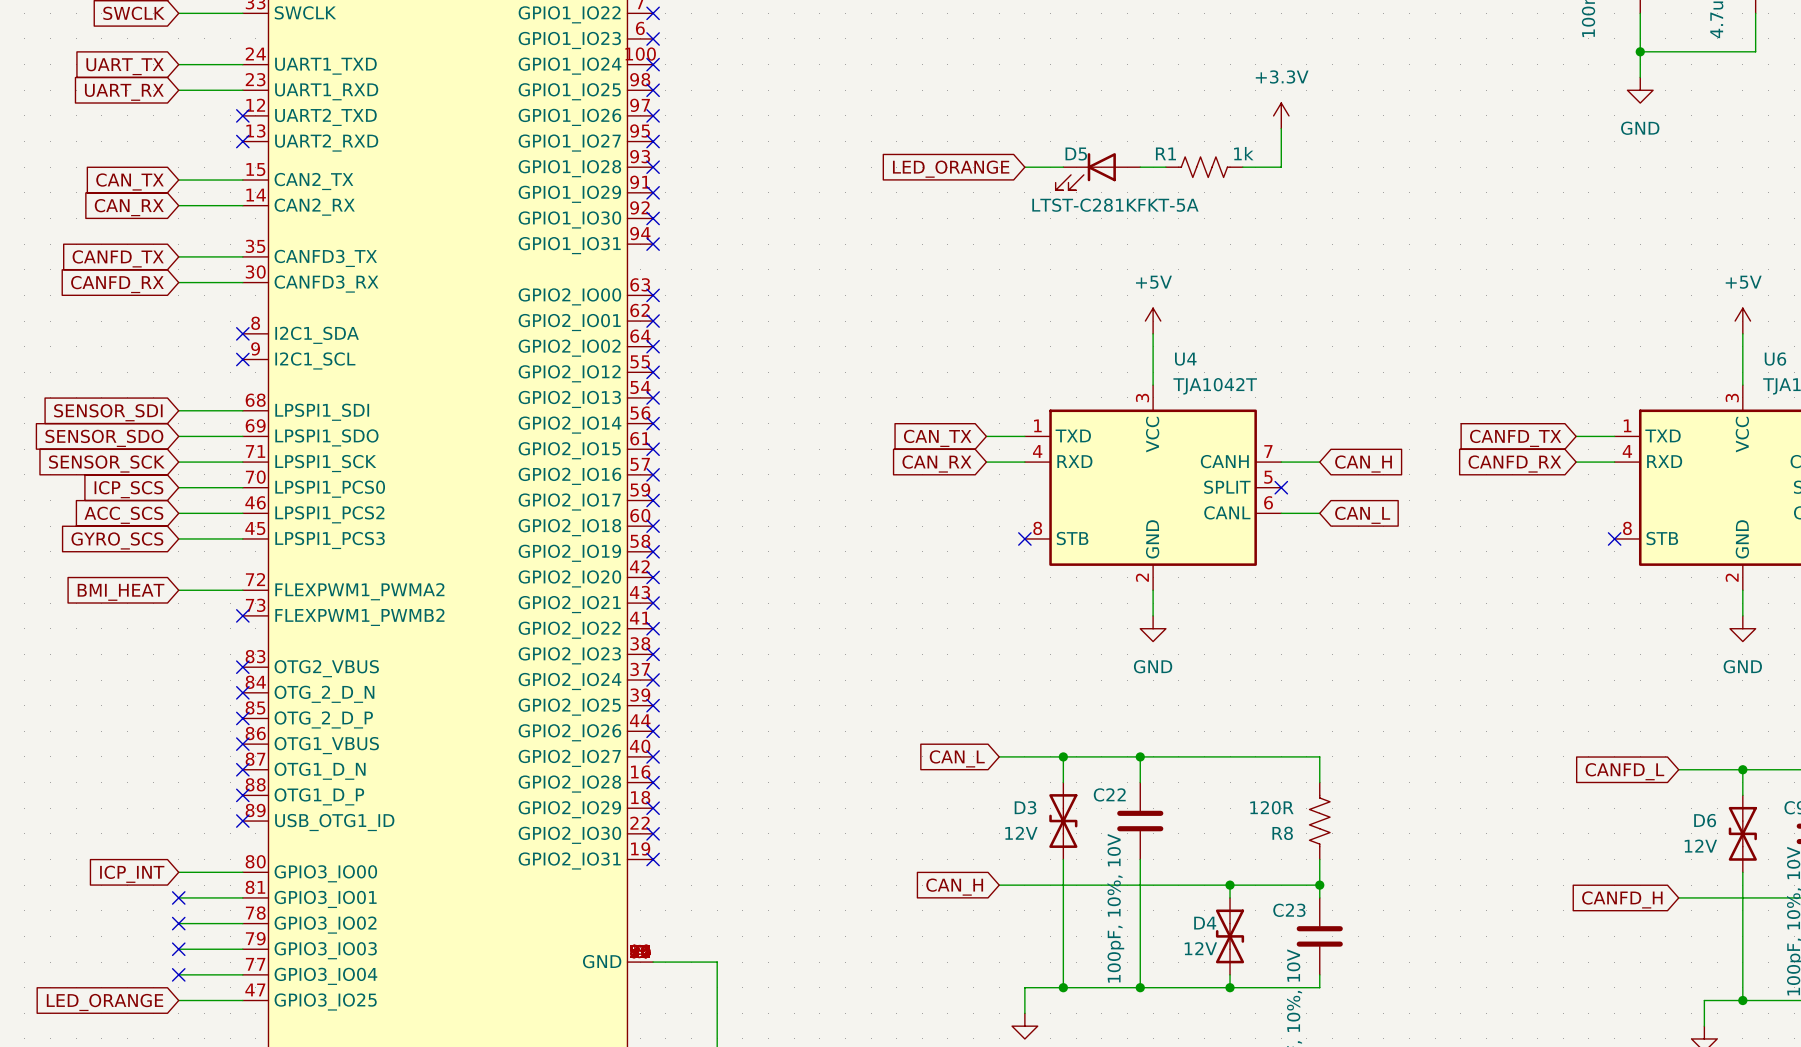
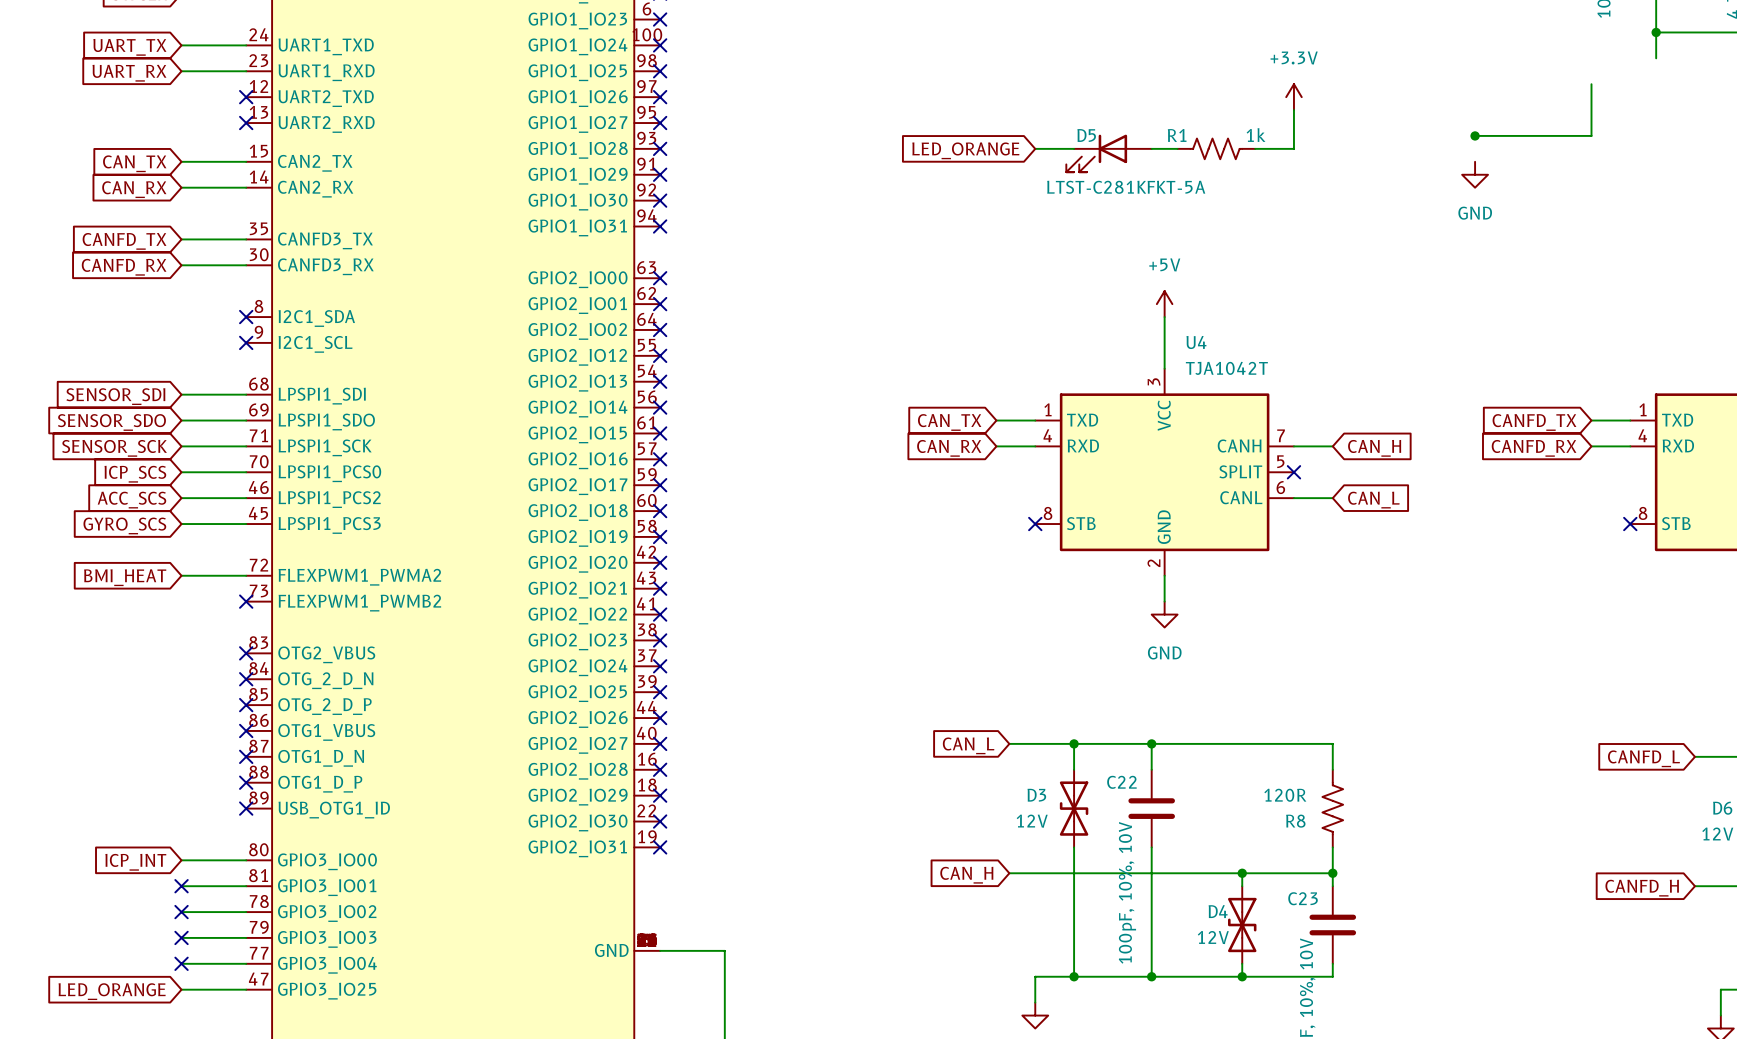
power symbol position: GND (1640, 90) -> GND (1475, 174)
wire: none -> (1591, 84) (1591, 135) (1475, 135)
junction: none -> (1475, 135)

